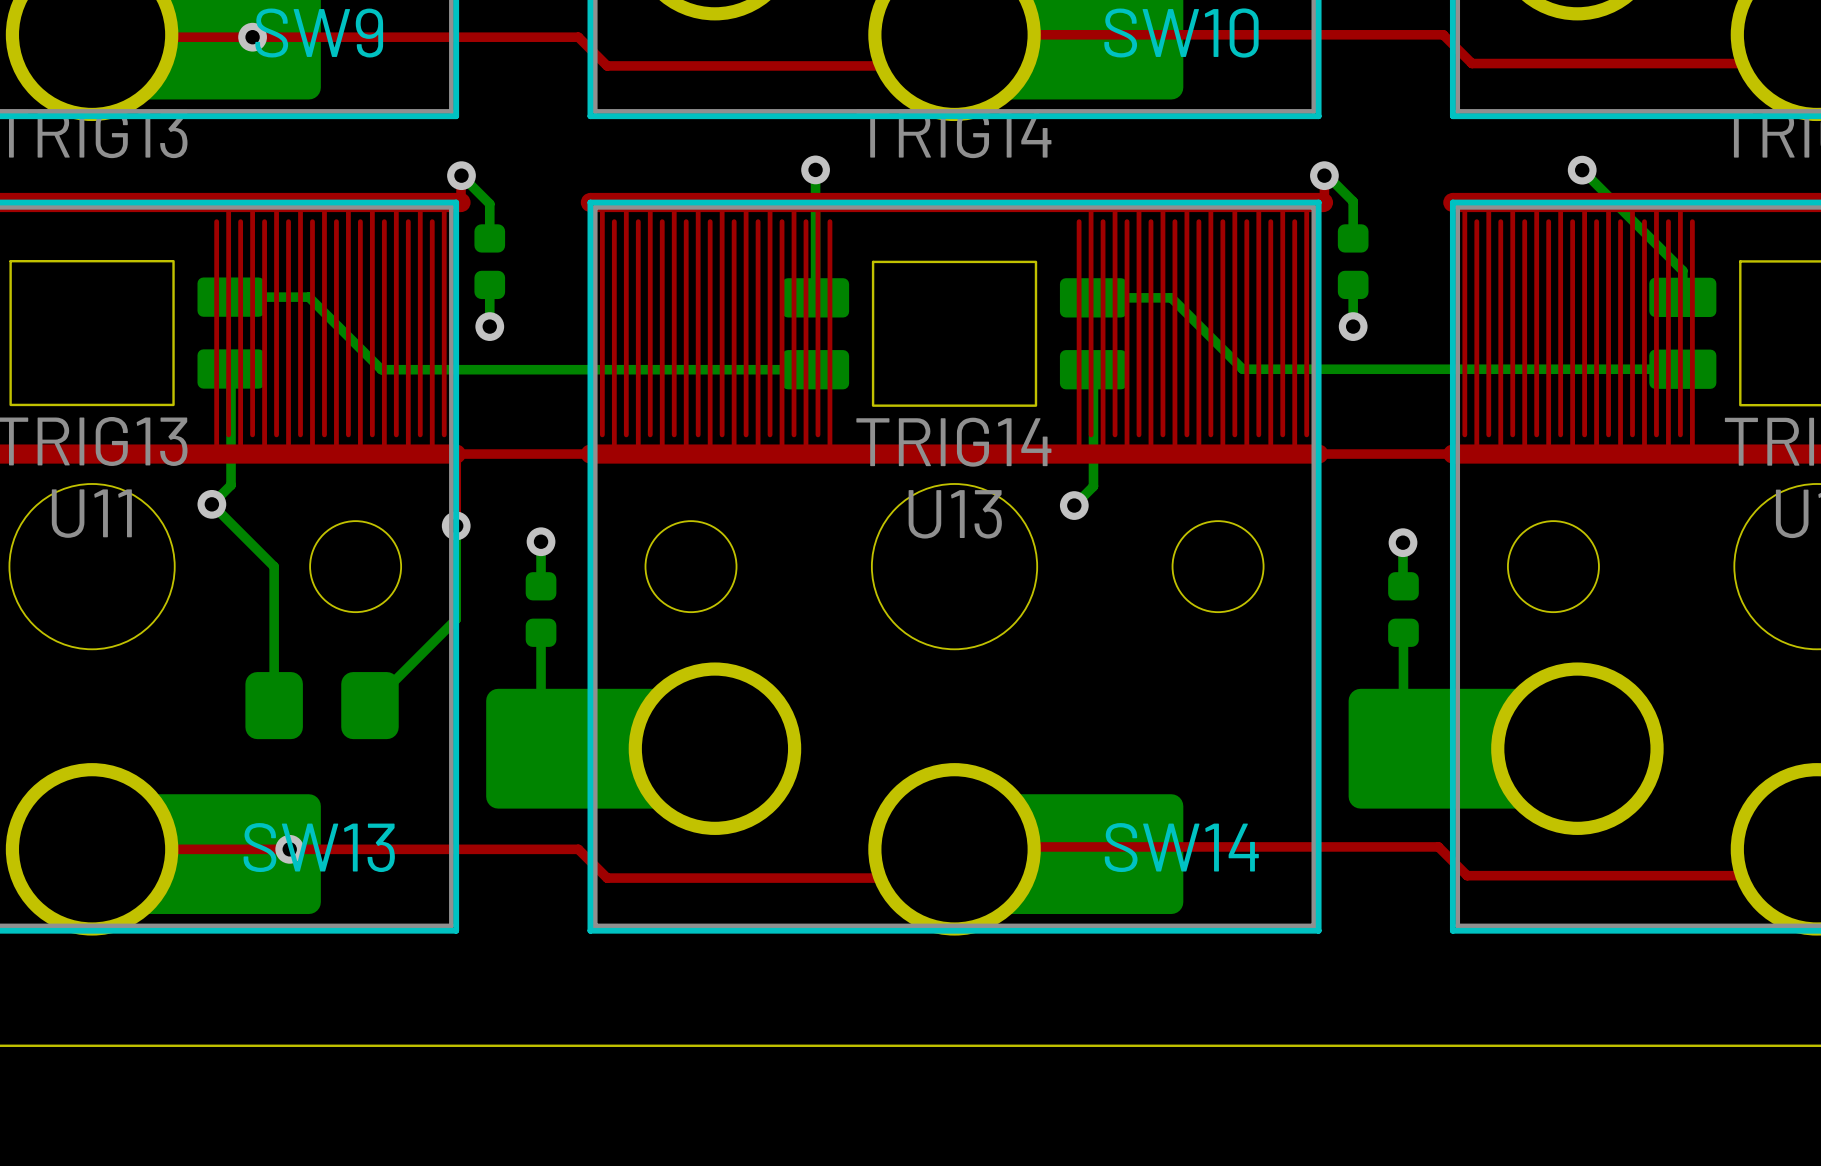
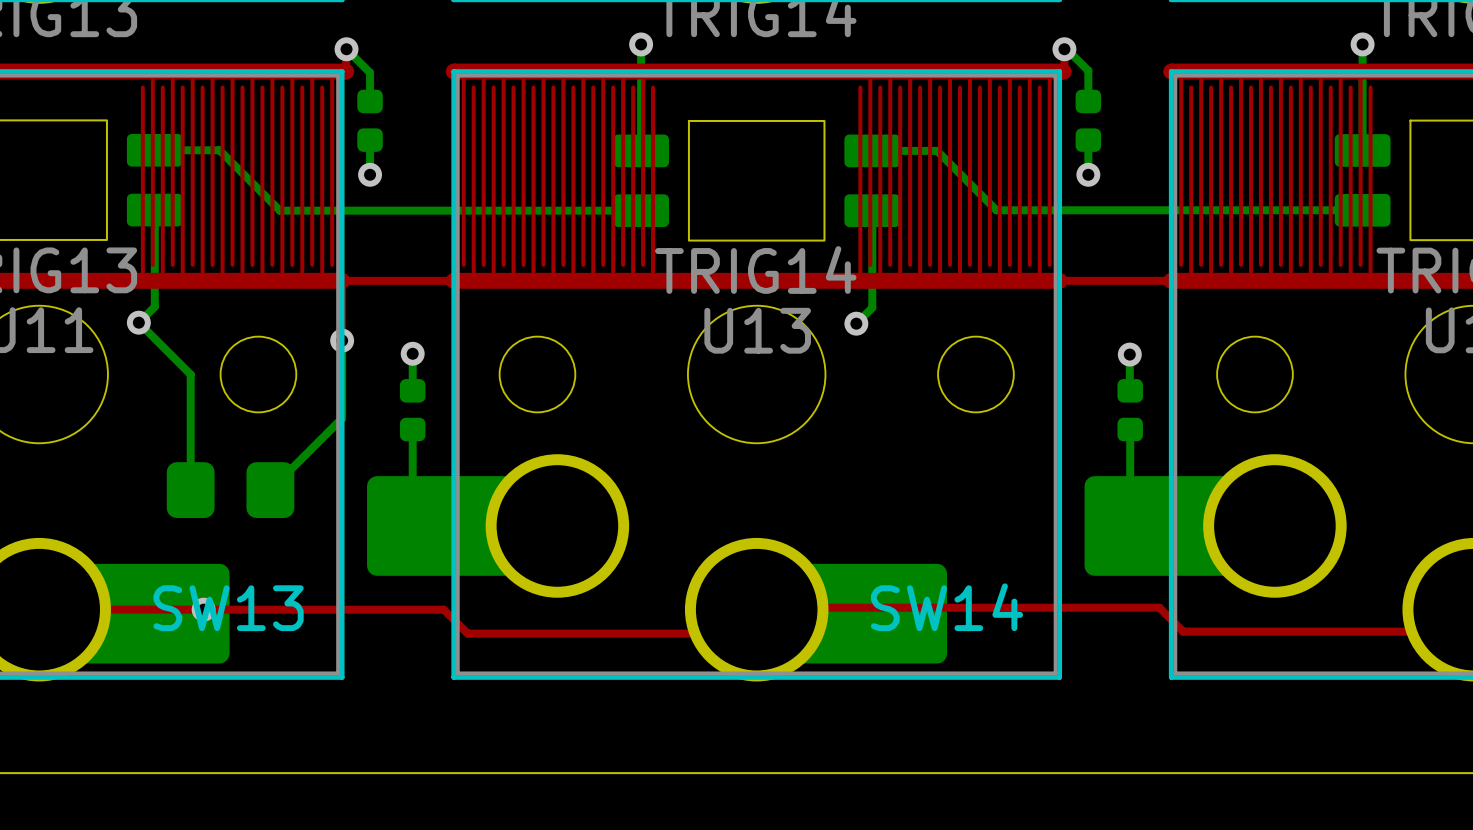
bottom track: (1582, 170) (1682, 270) -> (1362, 44) (1362, 128)
via position: (1582, 170) -> (1362, 44)

